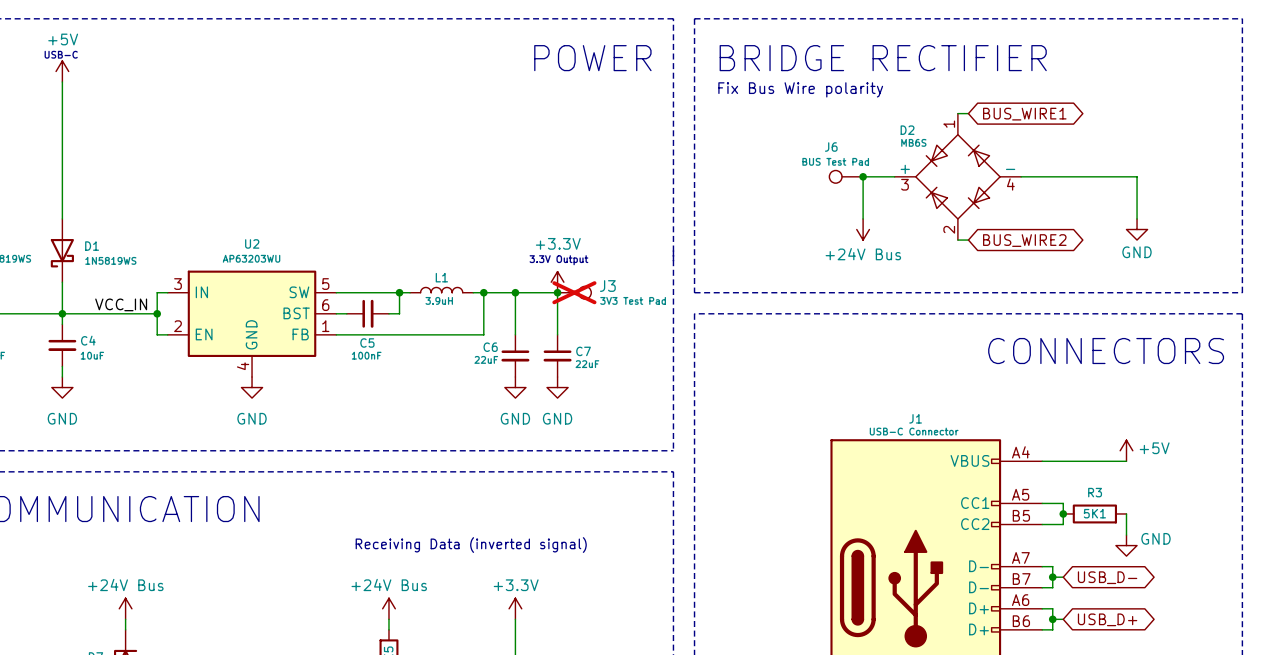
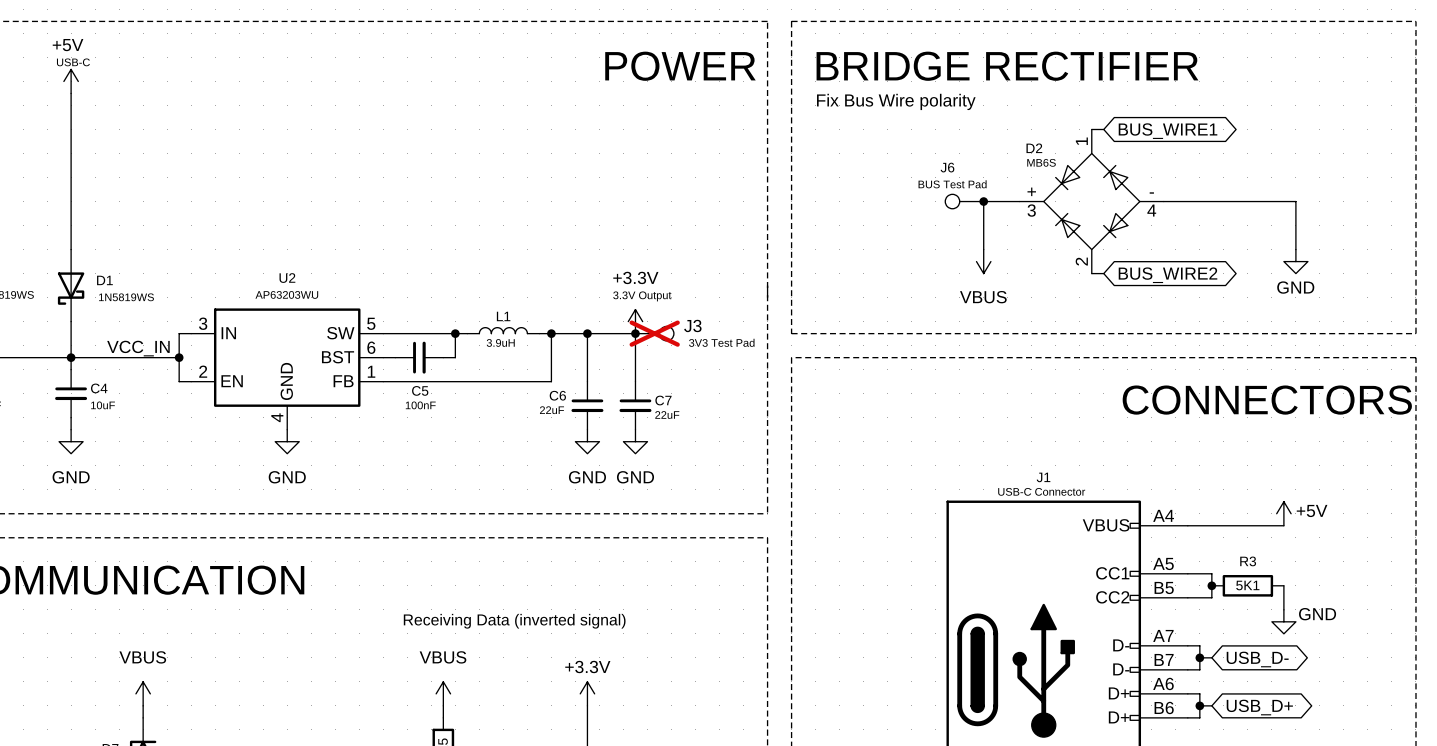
power symbol: +24V Bus (863, 229) -> VBUS (983, 261)
power symbol: +24V Bus (125, 608) -> VBUS (143, 693)
power symbol: +24V Bus (388, 608) -> VBUS (443, 693)

